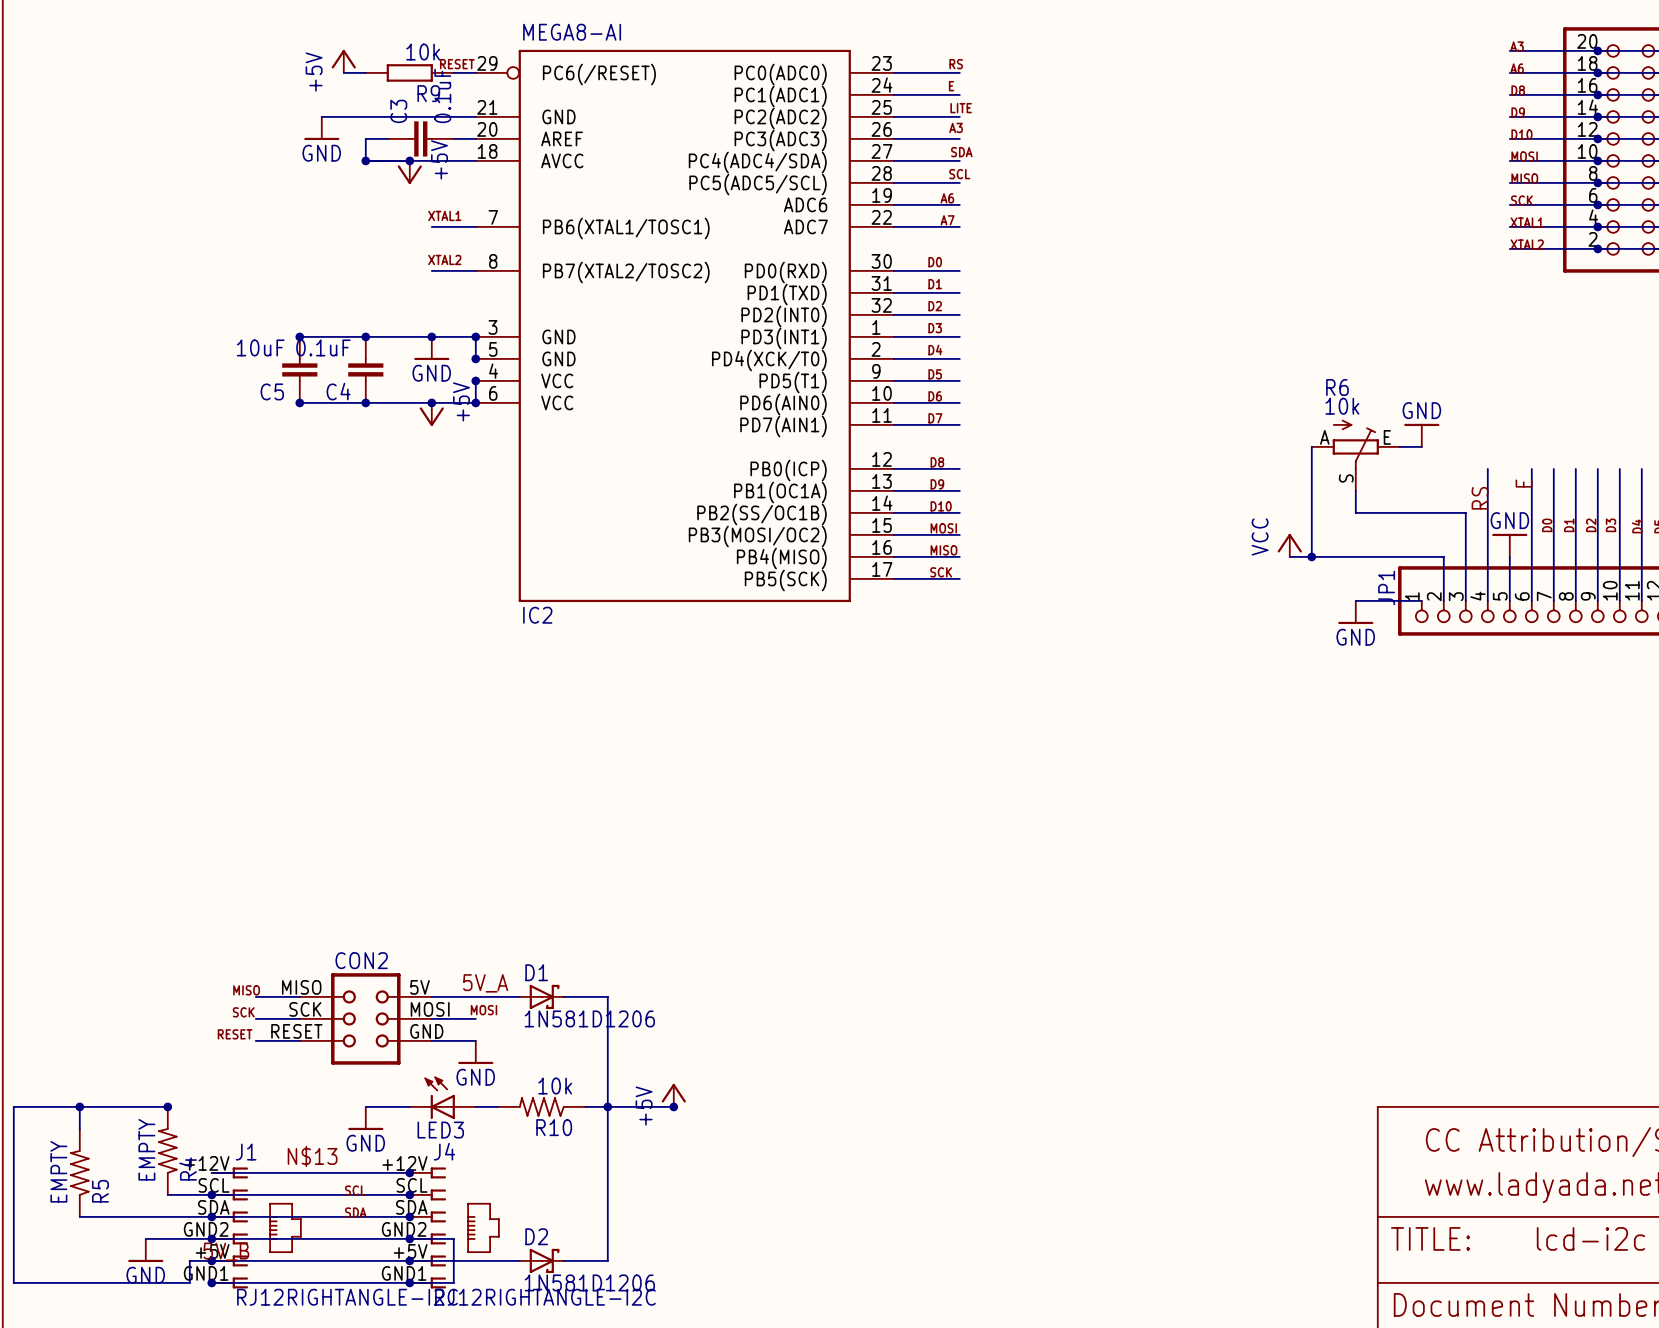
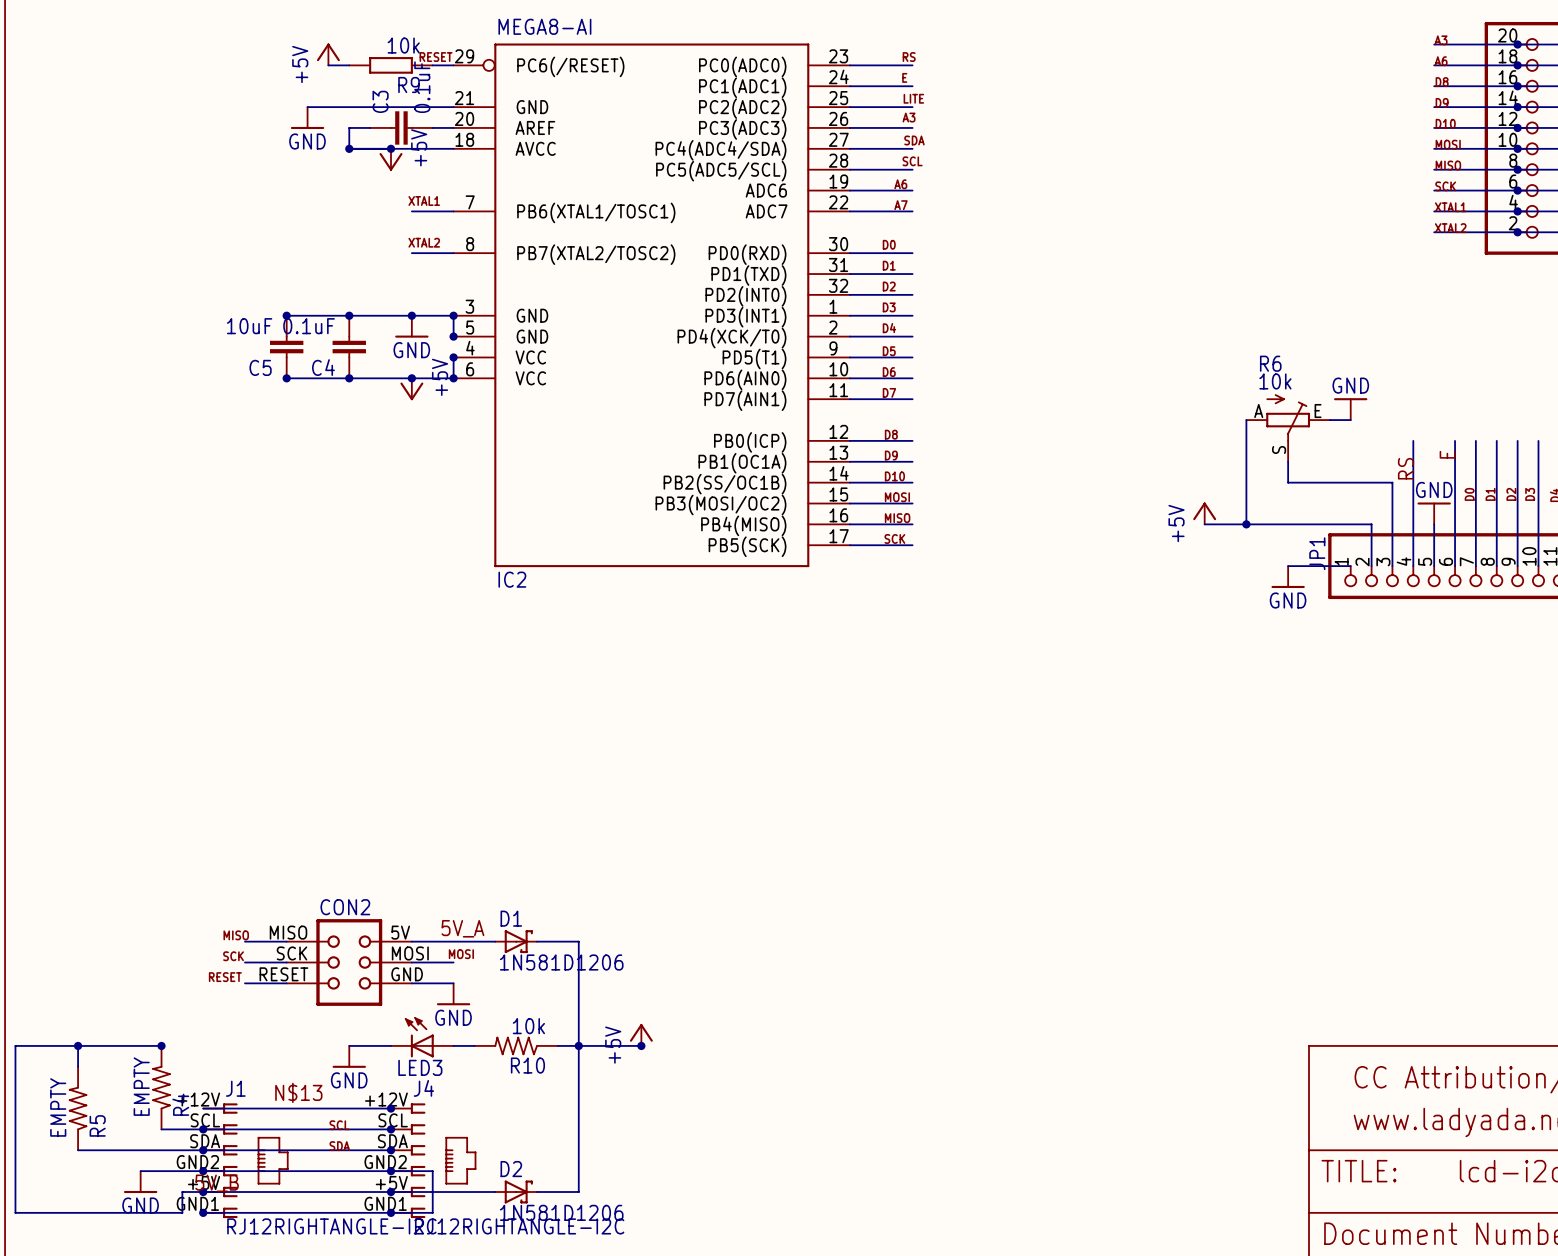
power symbol: none -> +5V (1204, 513)
power symbol: VCC (1289, 545) -> none
wire: none -> (1204, 524) (1225, 524)

